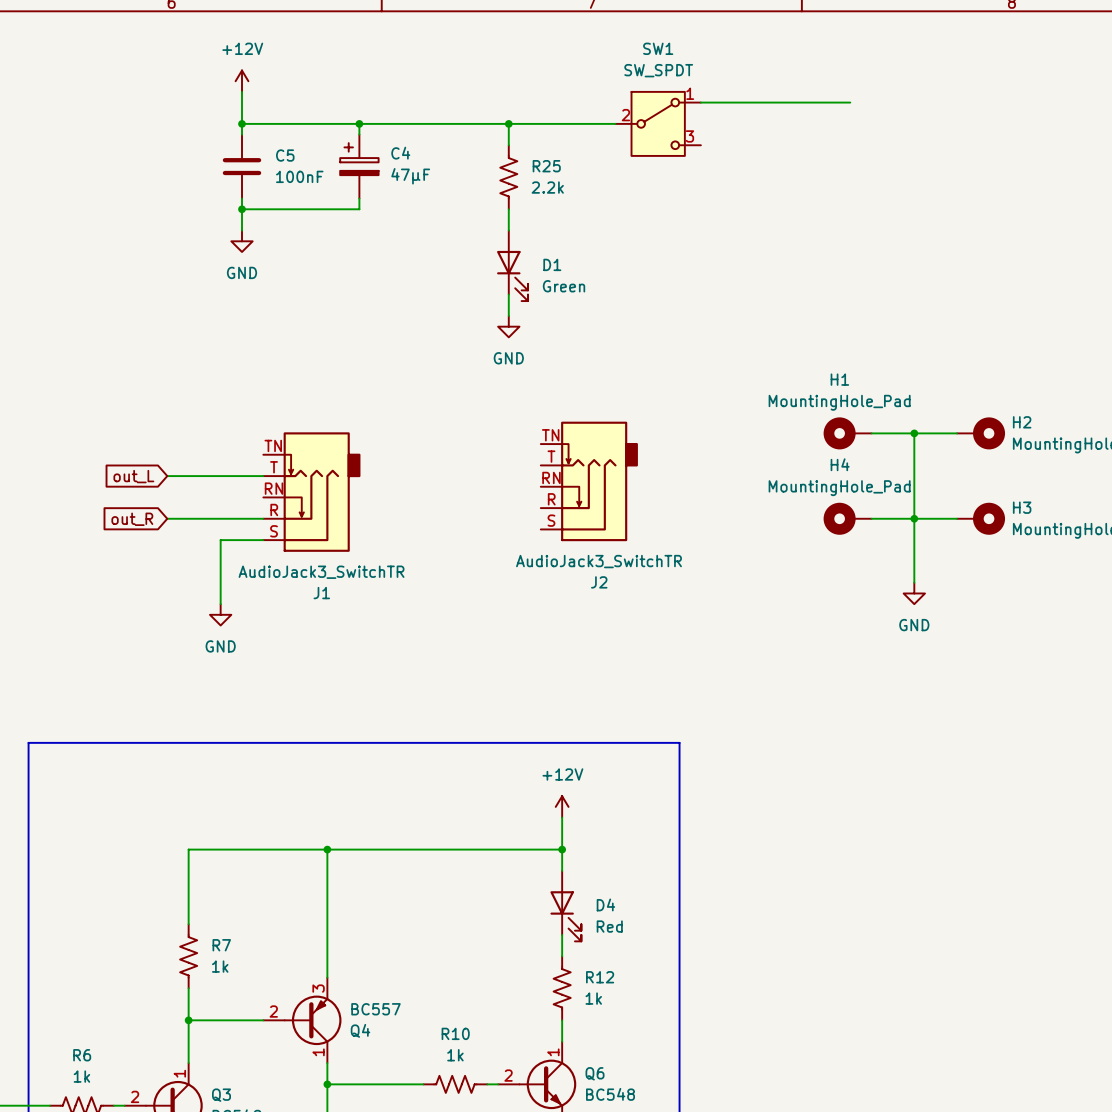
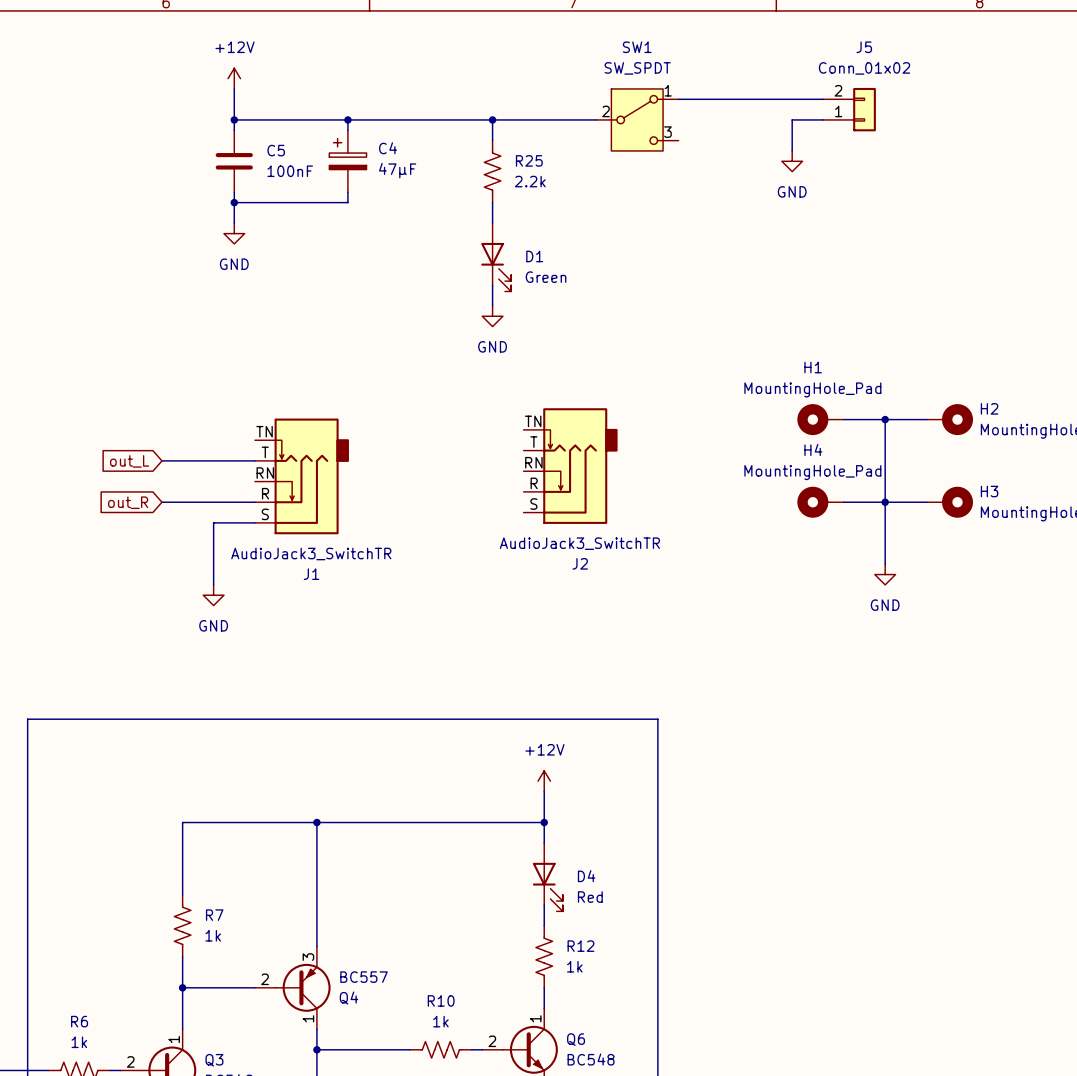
J5: none -> Conn_01x02 (849, 109)
wire: none -> (823, 119) (792, 119) (792, 150)
power symbol: none -> GND (792, 161)

